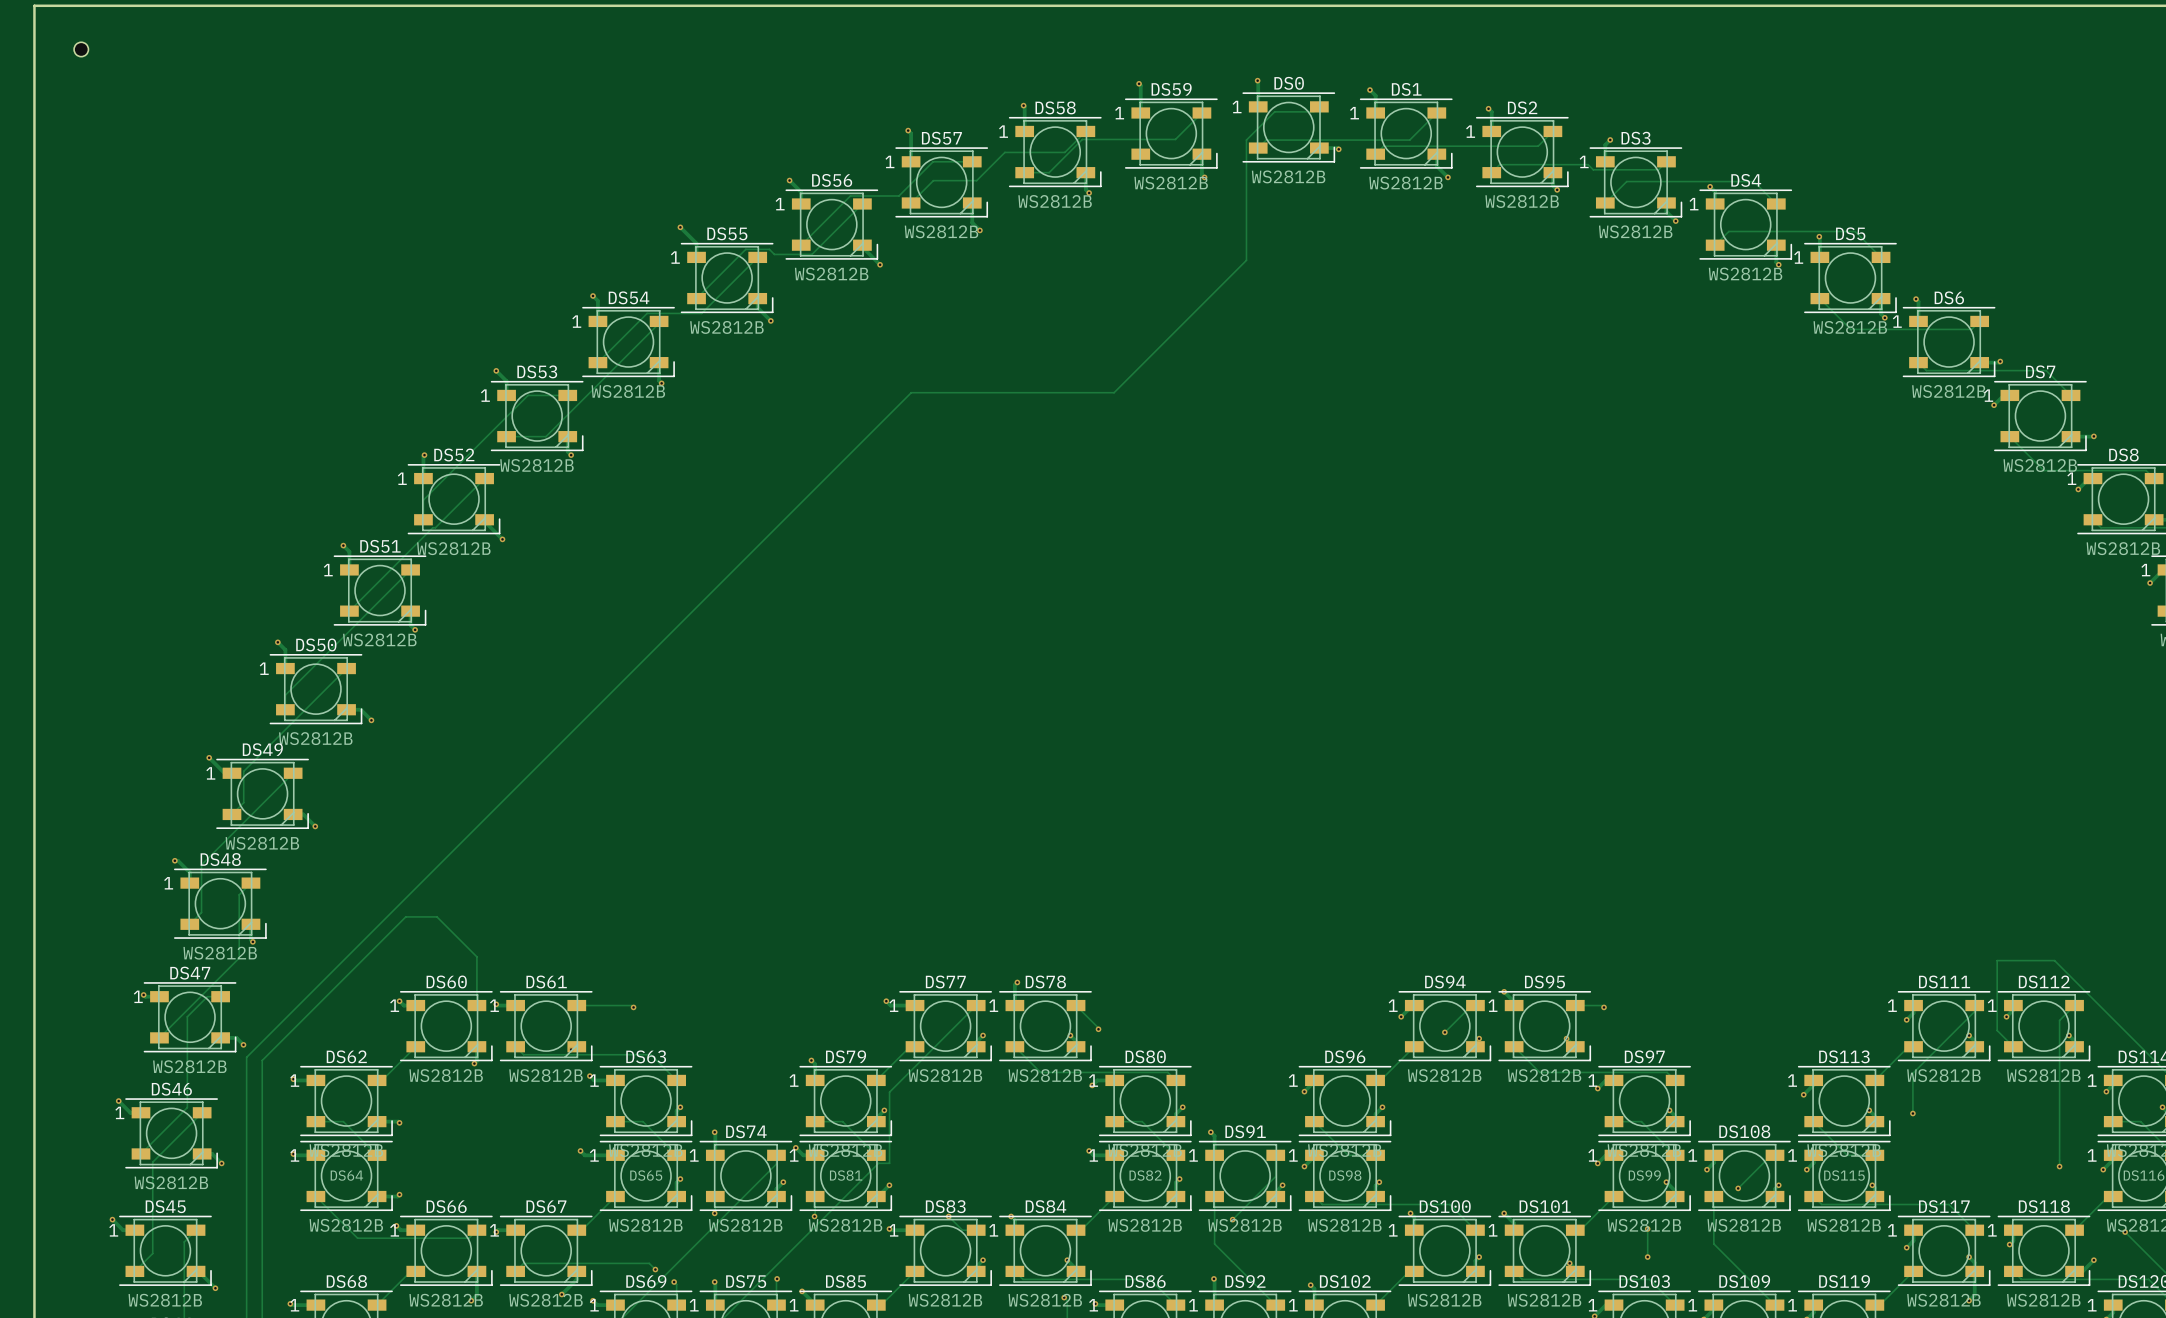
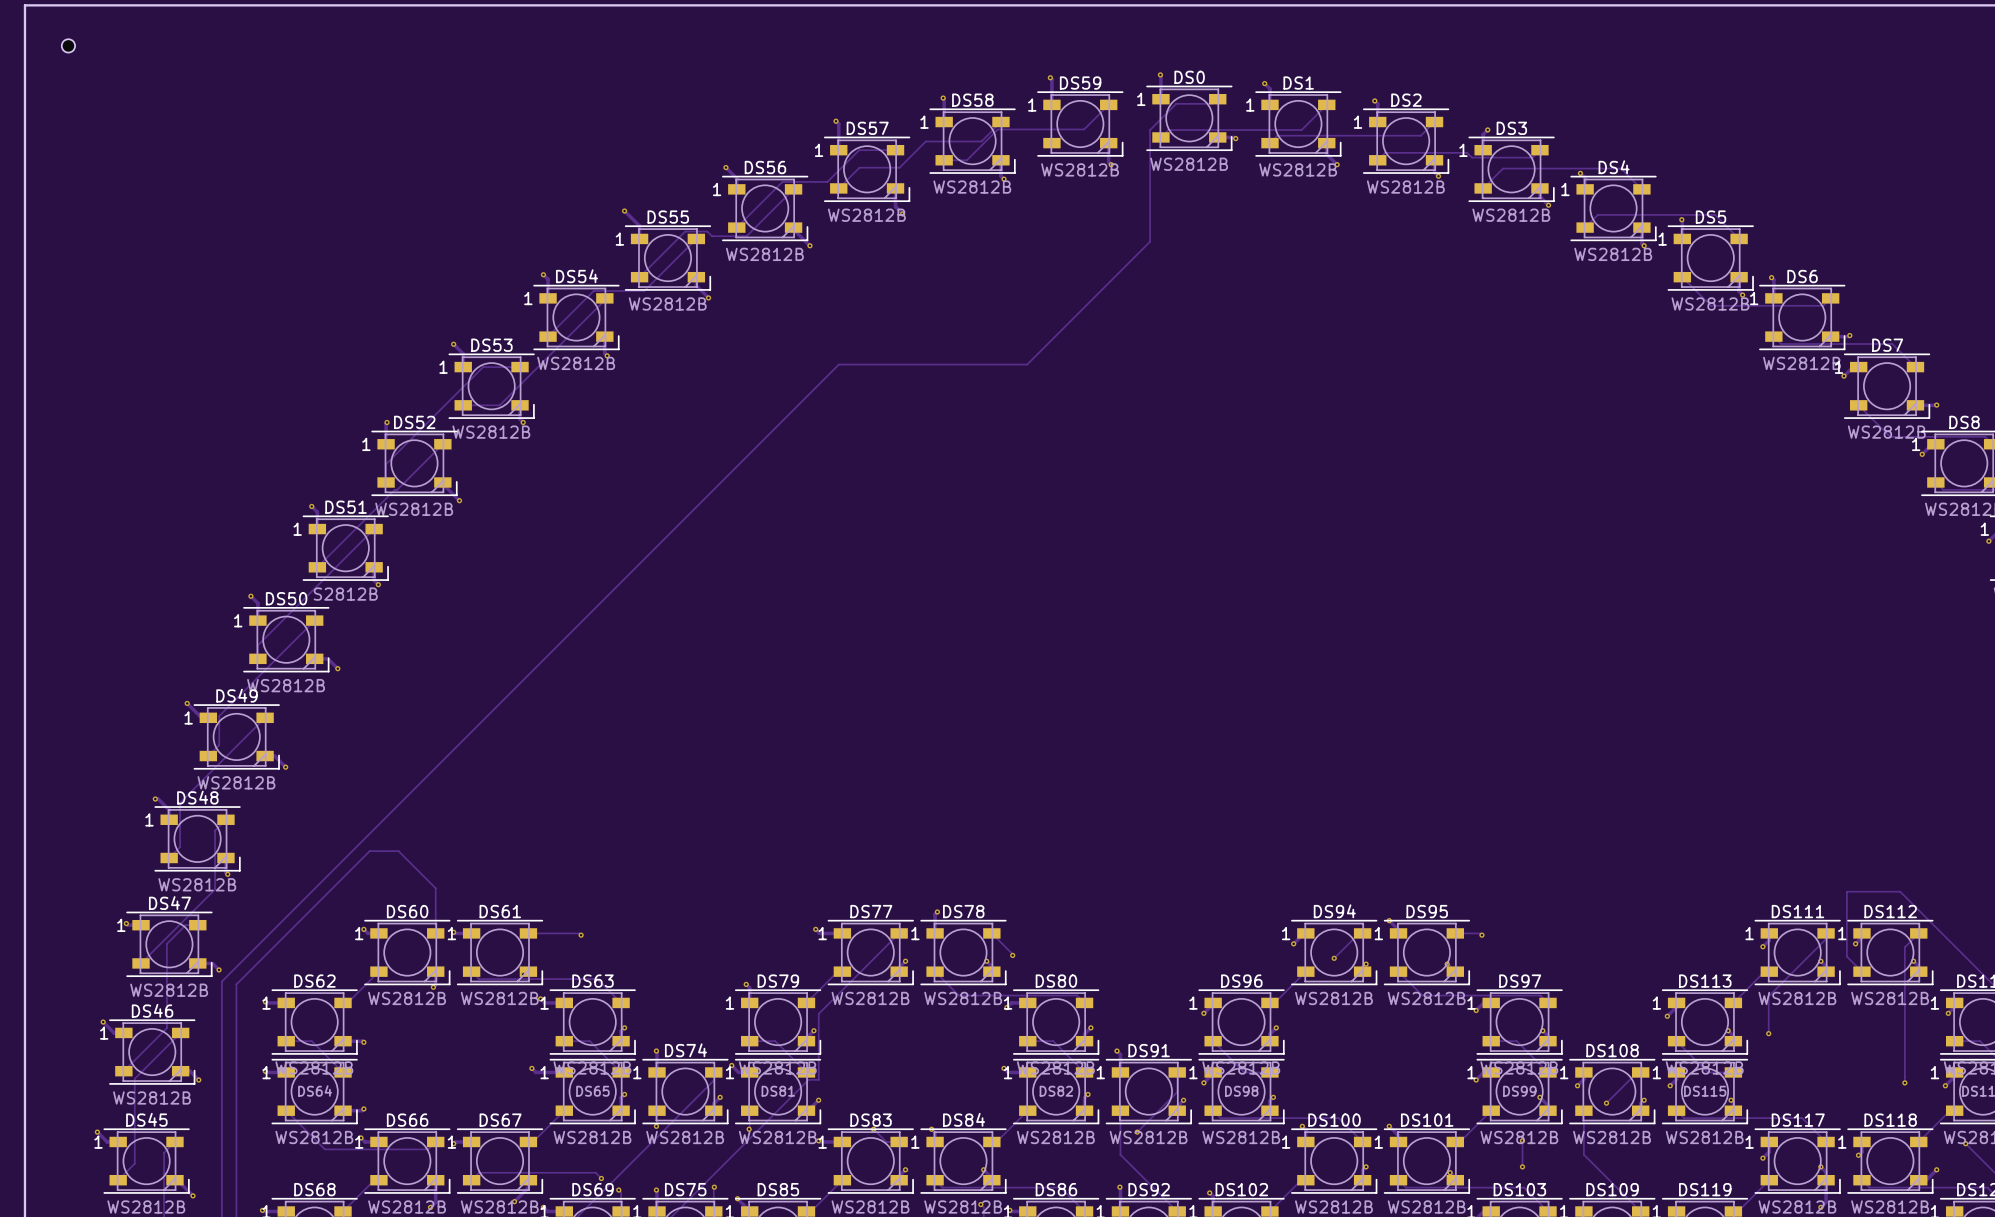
DS51 value: WS2812B (379, 640) -> S2812B (345, 594)

